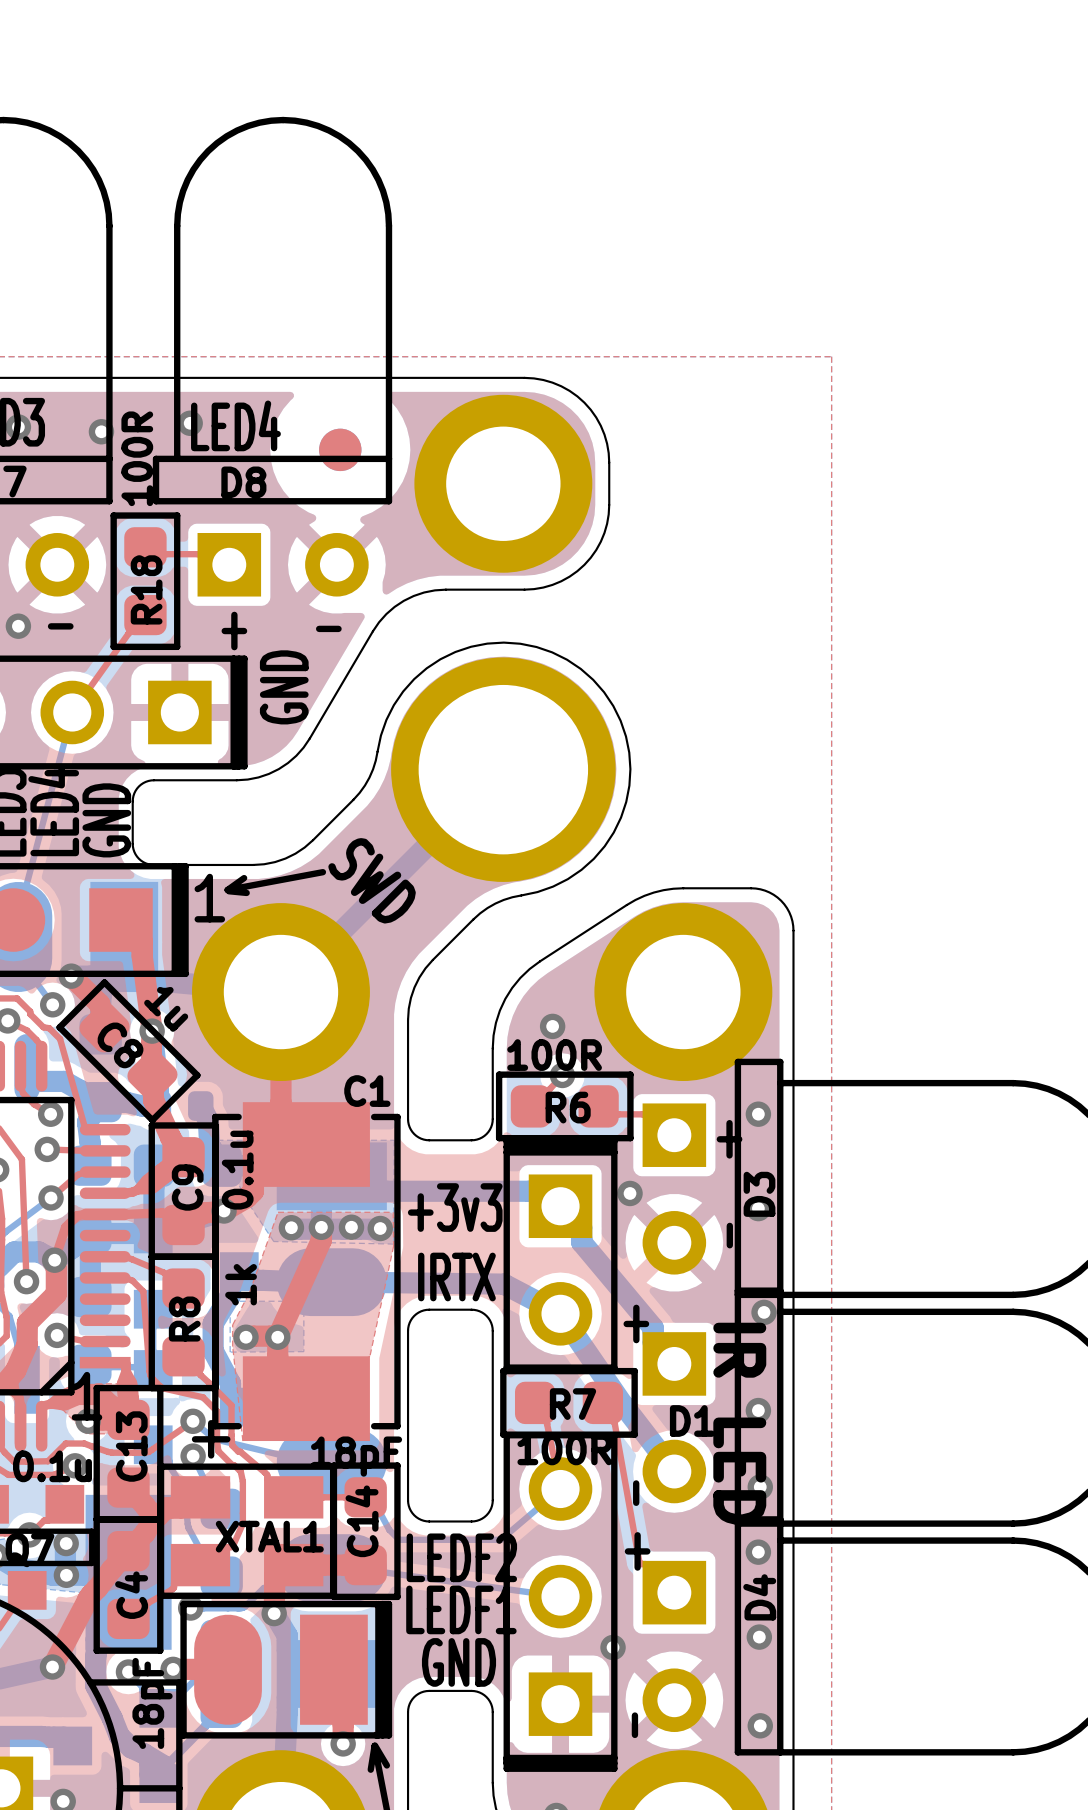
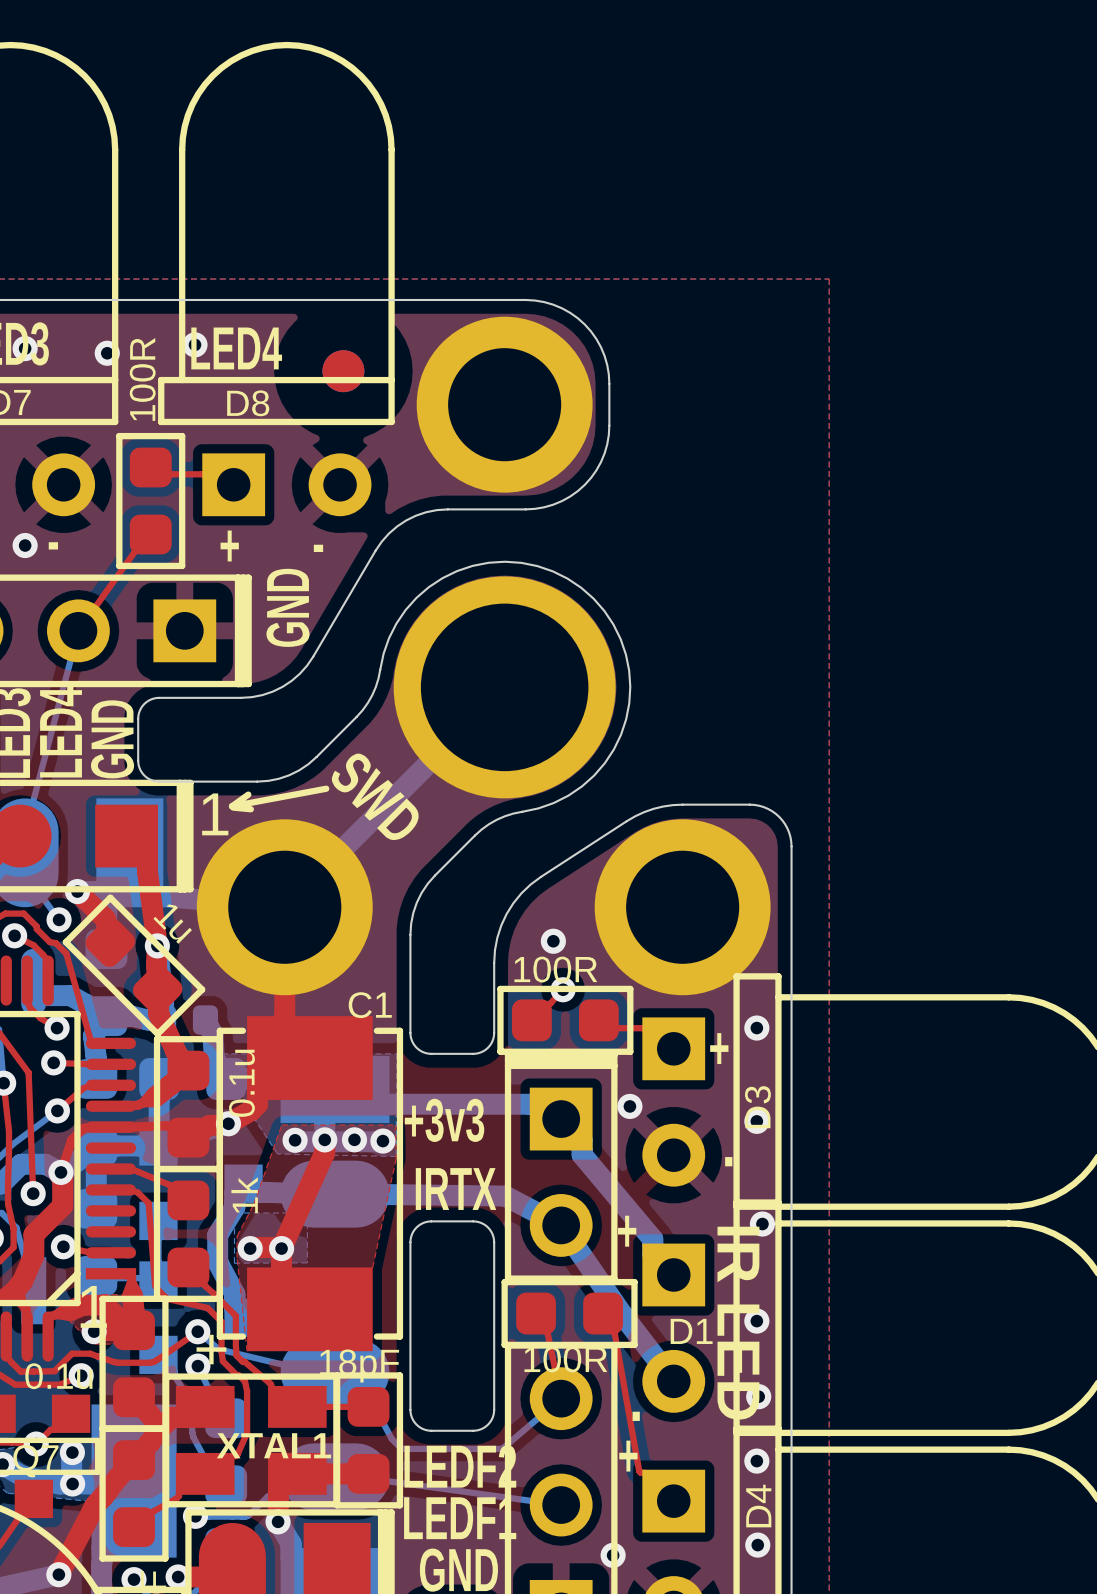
R18 name: R18 (146, 589) -> none
C8 name: C8 (120, 1045) -> none
R6 name: R6 (568, 1107) -> none
C9 name: C9 (187, 1187) -> none
R8 name: R8 (184, 1319) -> none
R7 name: R7 (572, 1404) -> none
C13 name: C13 (131, 1446) -> none
C14 name: C14 (362, 1521) -> none
C4 name: C4 (131, 1595) -> none

